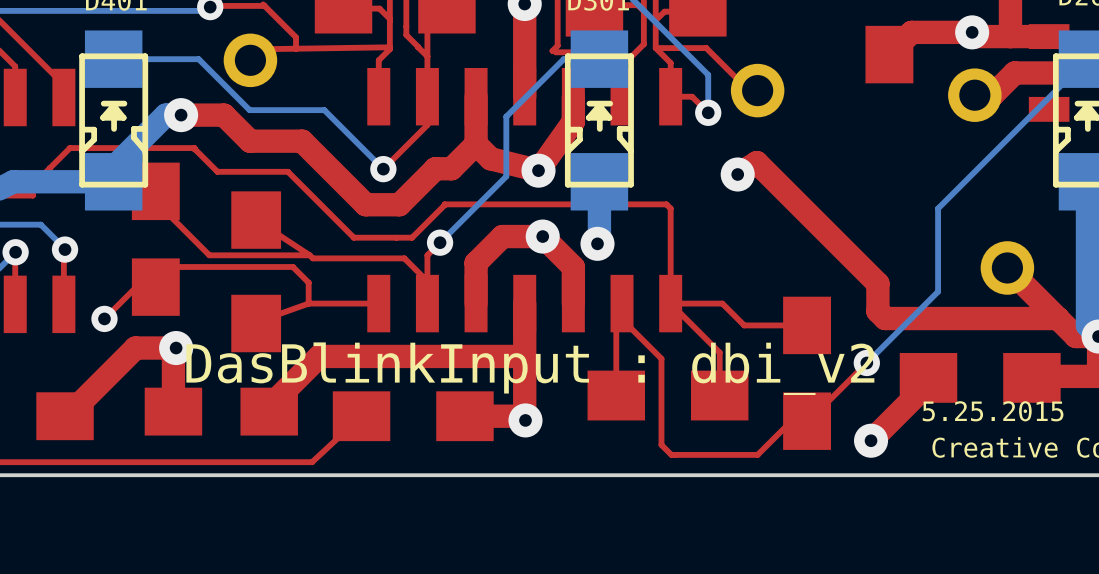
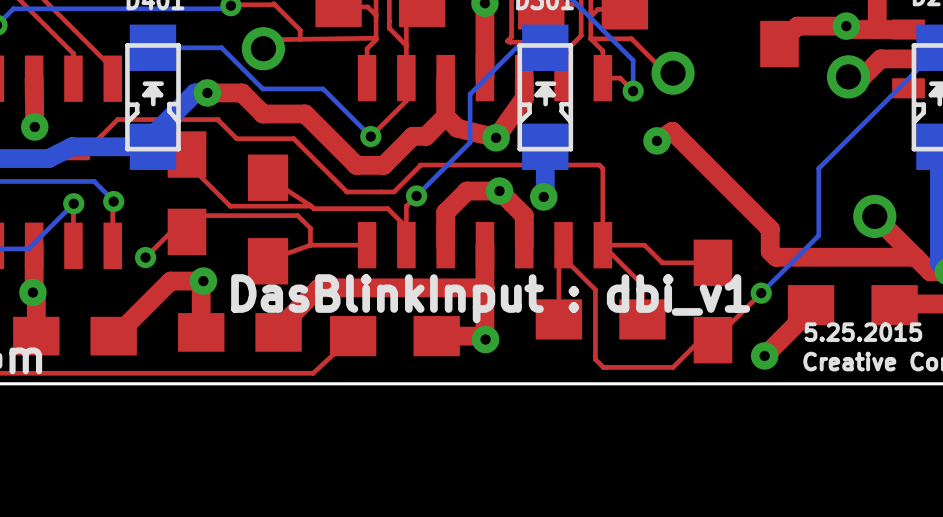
text: DasBlinkInput : dbi_v2 (530, 368) -> DasBlinkInput : dbi_v1 (490, 298)

